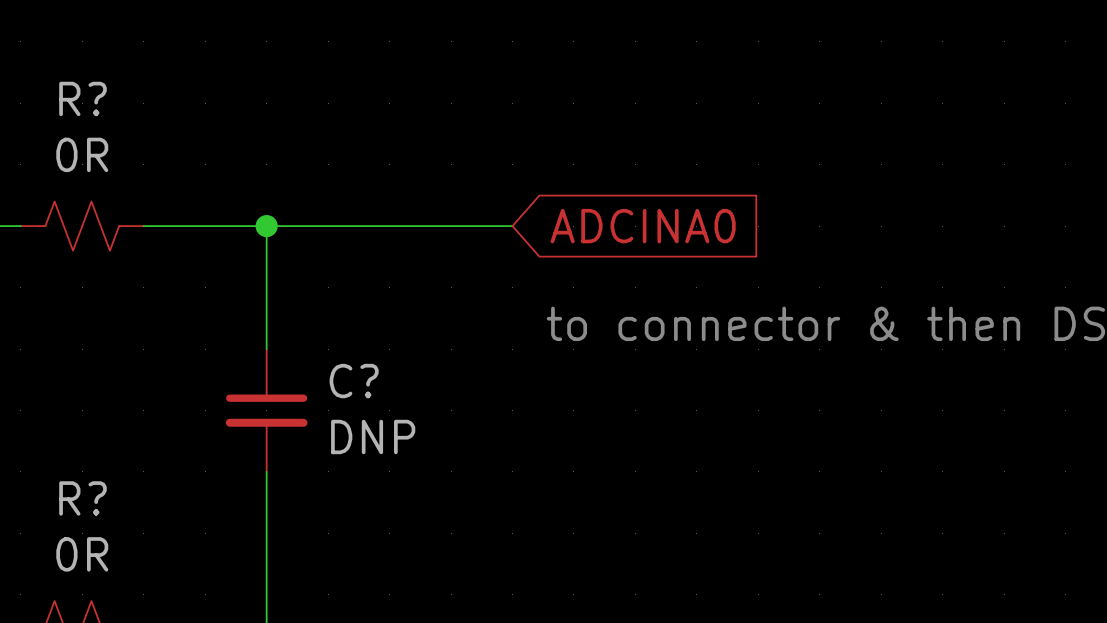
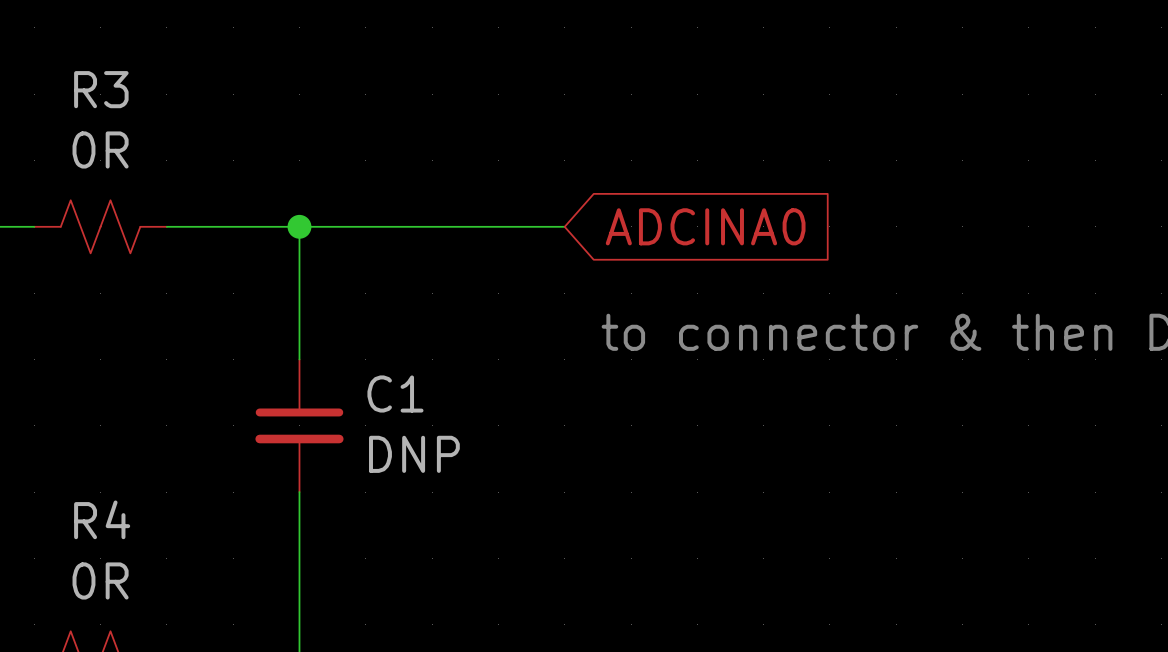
R? name: R? (83, 98) -> R3 (101, 89)
C? name: C? (354, 381) -> C1 (395, 393)
R? name: R? (83, 498) -> R4 (102, 519)

